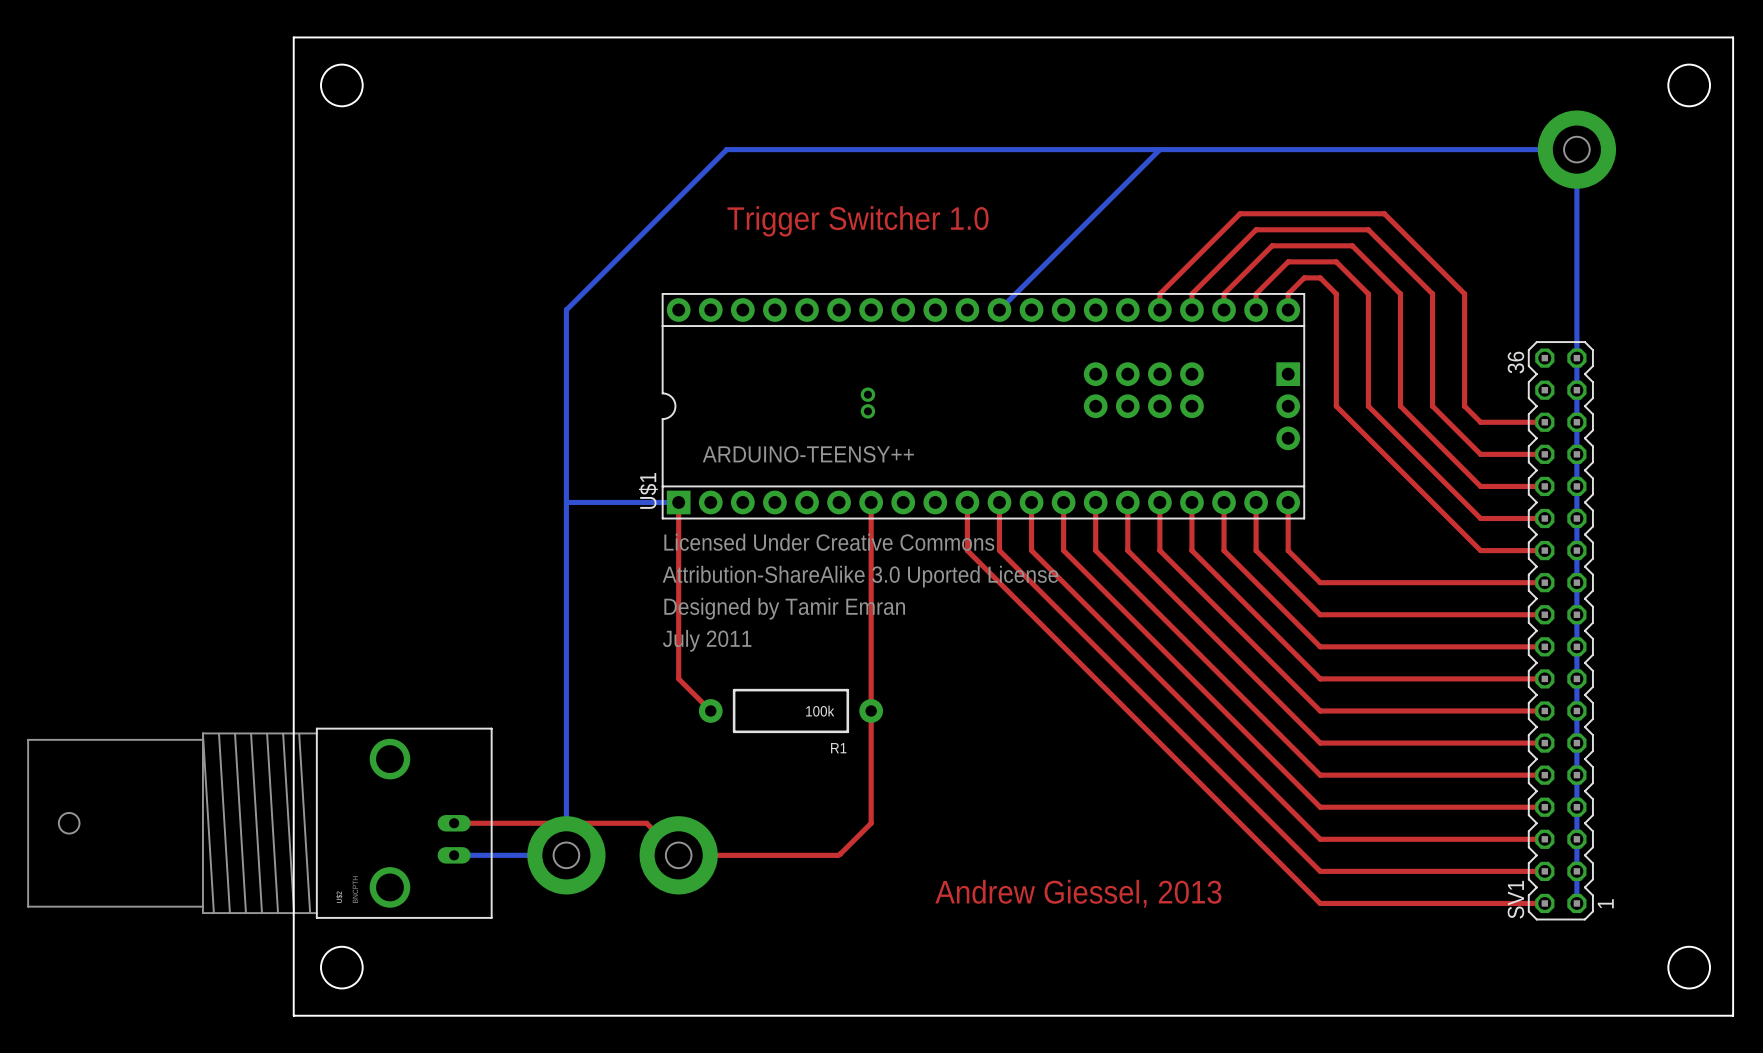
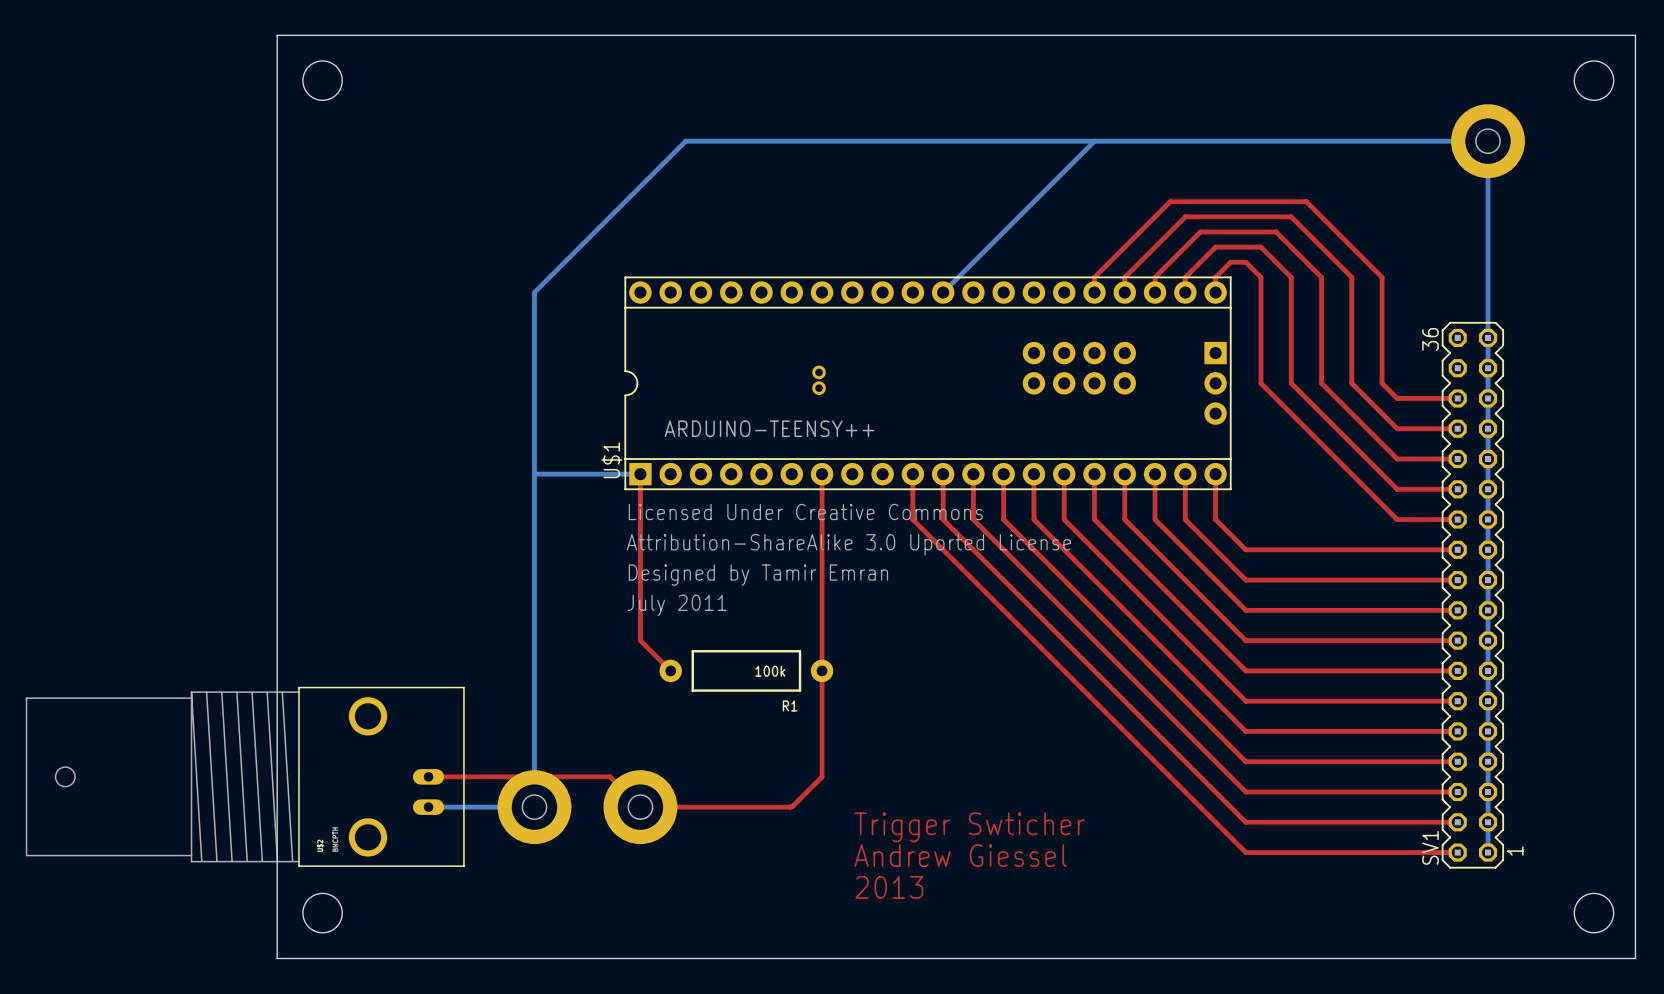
text: Trigger Switcher 1.0 (857, 221) -> none
text: none -> Trigger Swticher (969, 827)
text: Andrew Giessel, 2013 (1078, 893) -> Andrew Giessel (960, 855)
text: none -> 2013 (889, 887)

